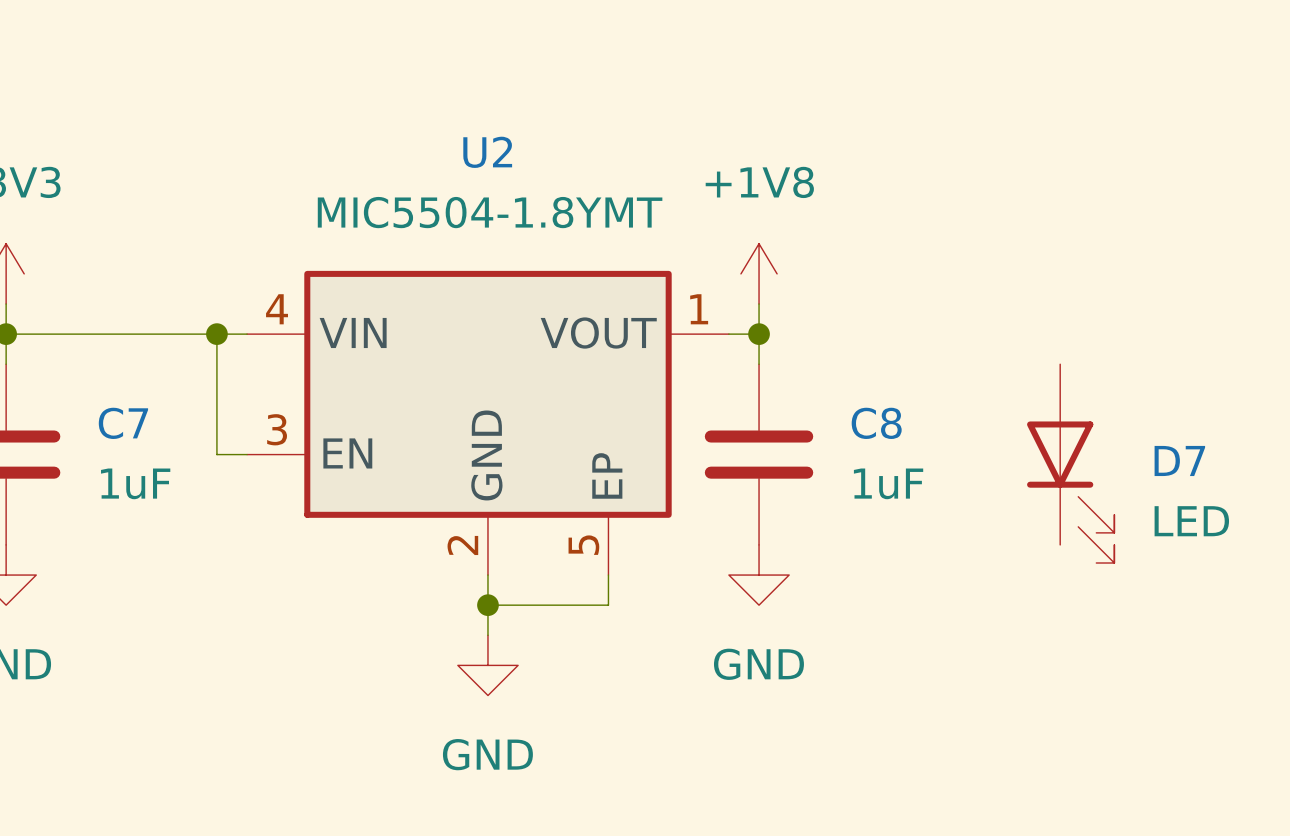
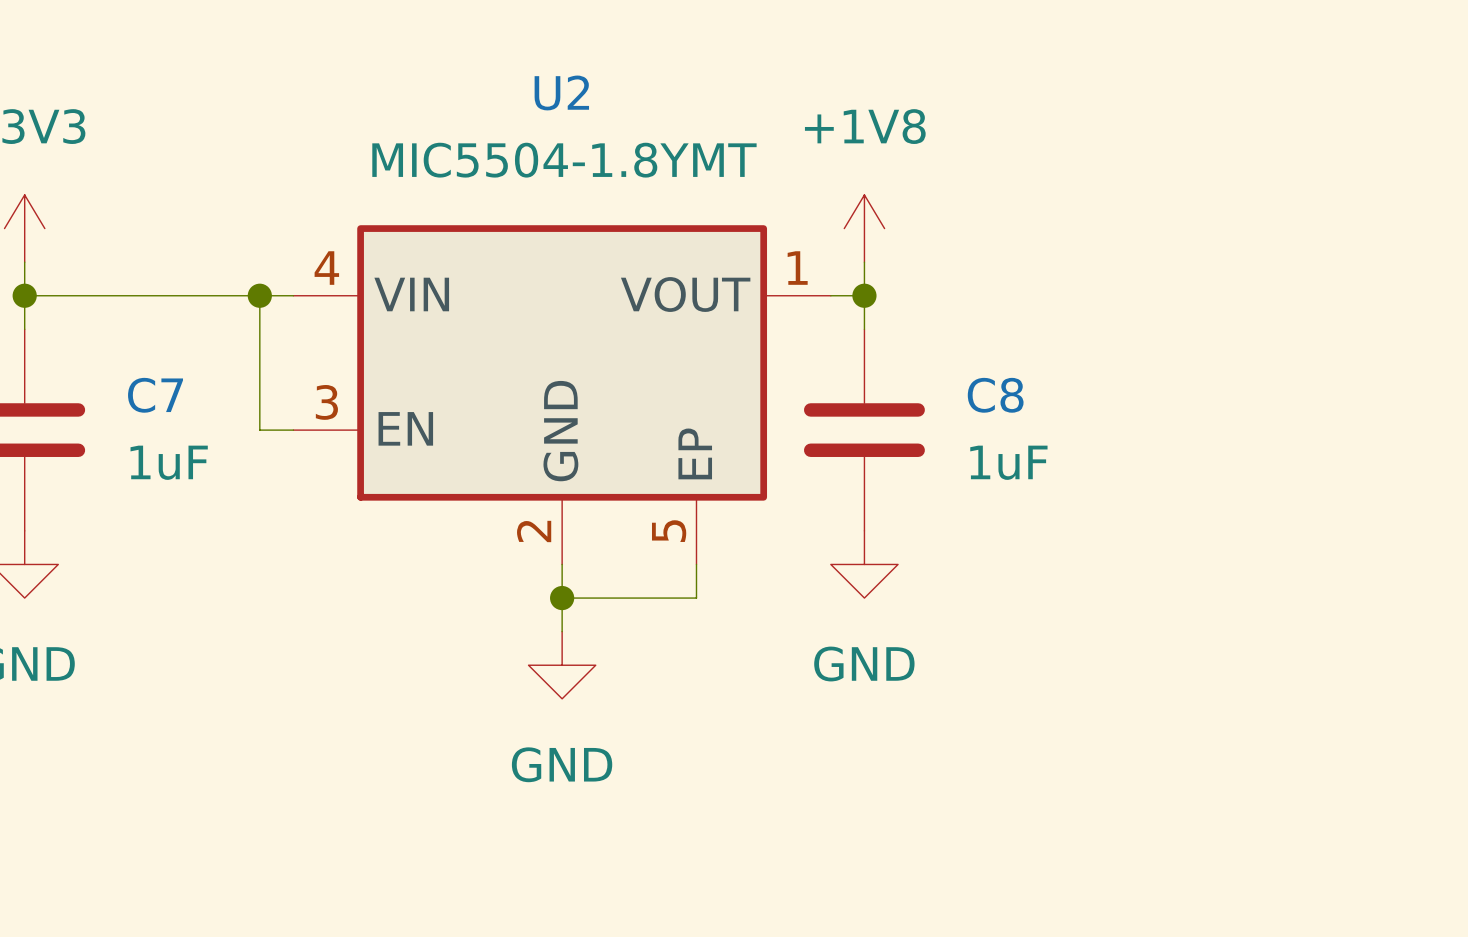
D7: LED (1070, 463) -> none

